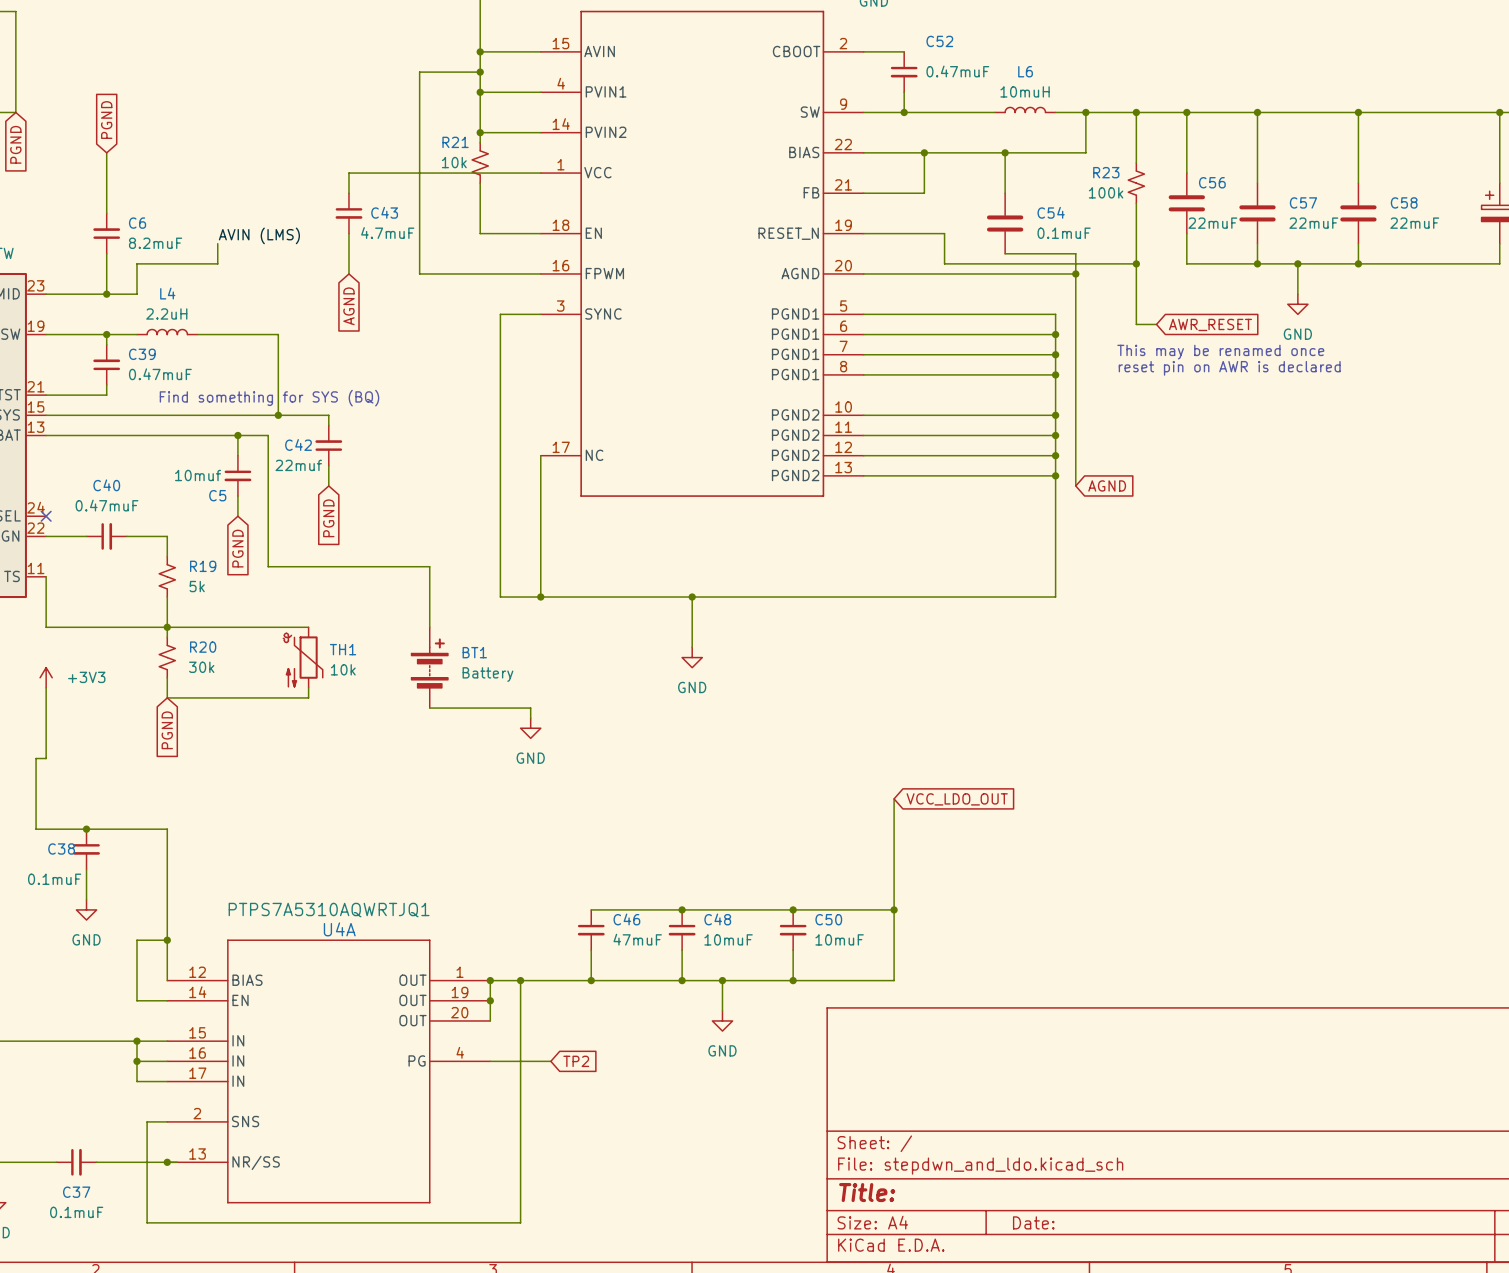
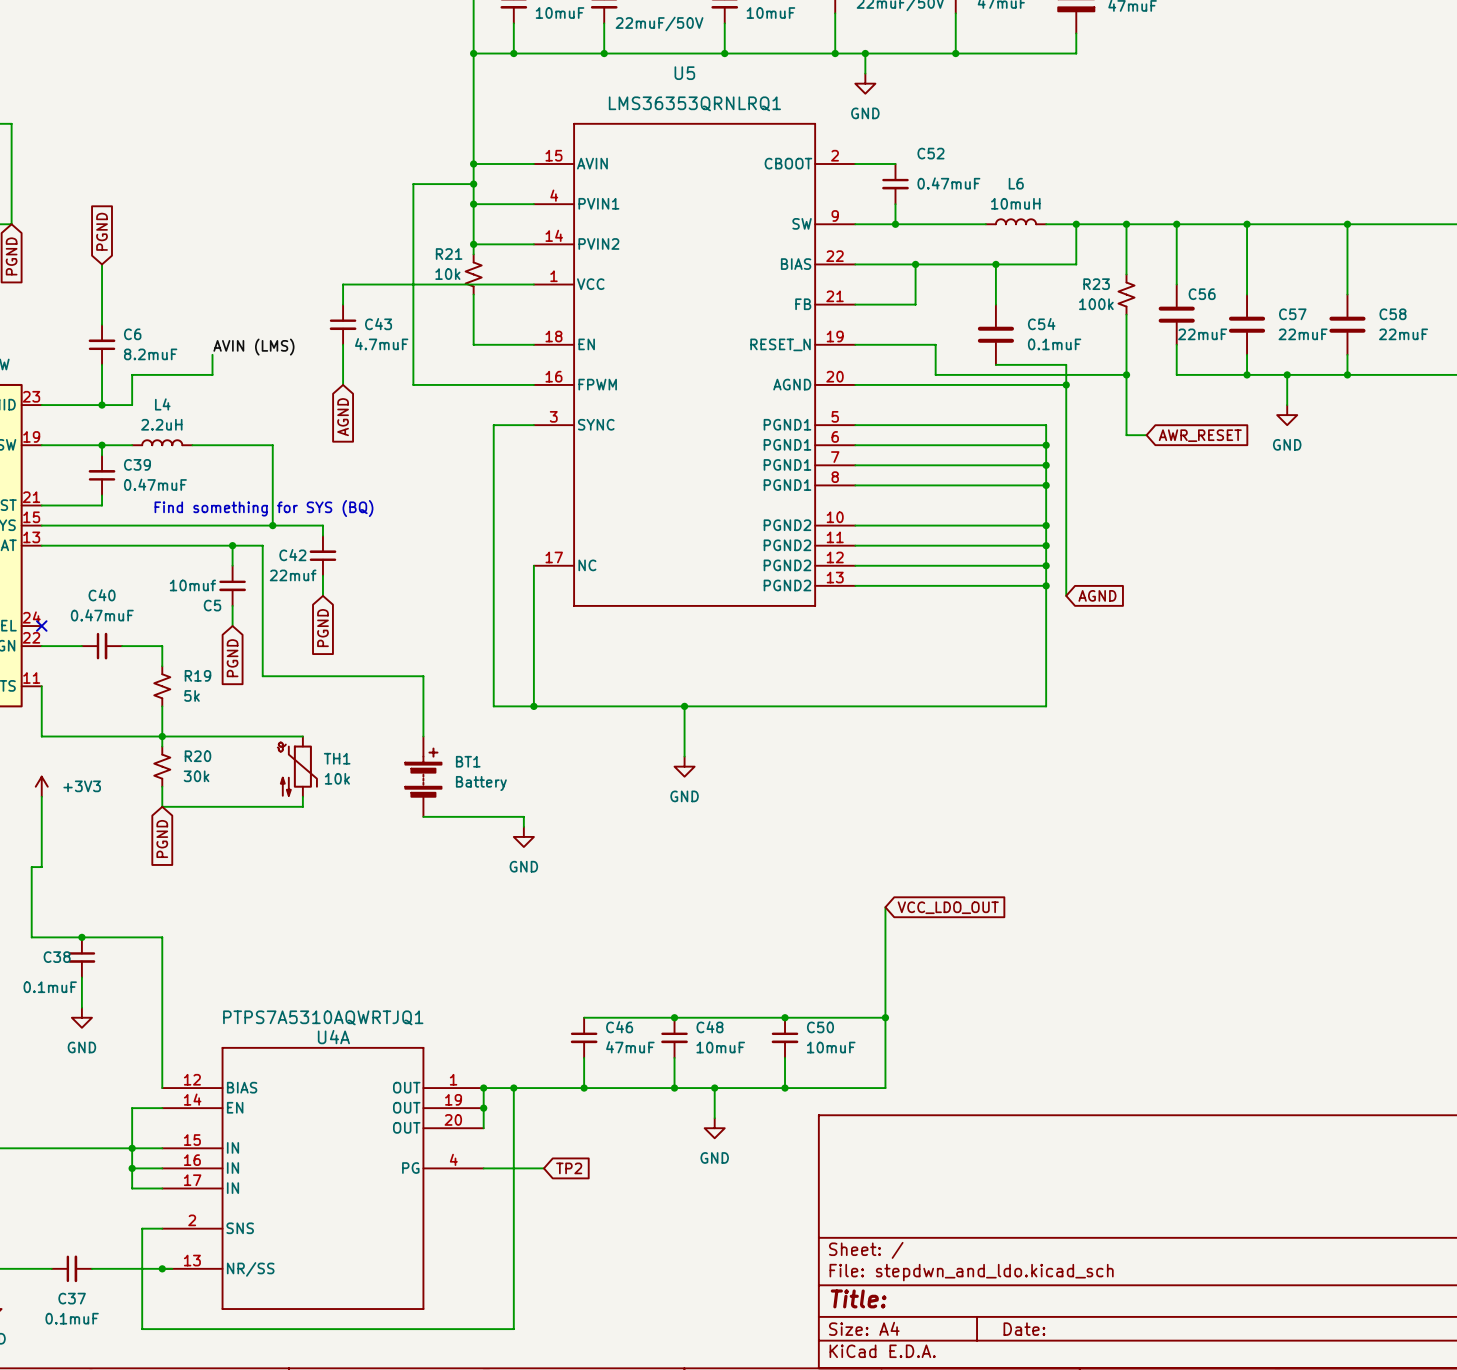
text: This may be renamed once (1220, 352) -> none
text: reset pin on AWR is declared (1229, 368) -> none
wire: (167, 940) (136, 940) (136, 1000) -> (132, 1148) (132, 1108)
junction: (167, 940) -> none

